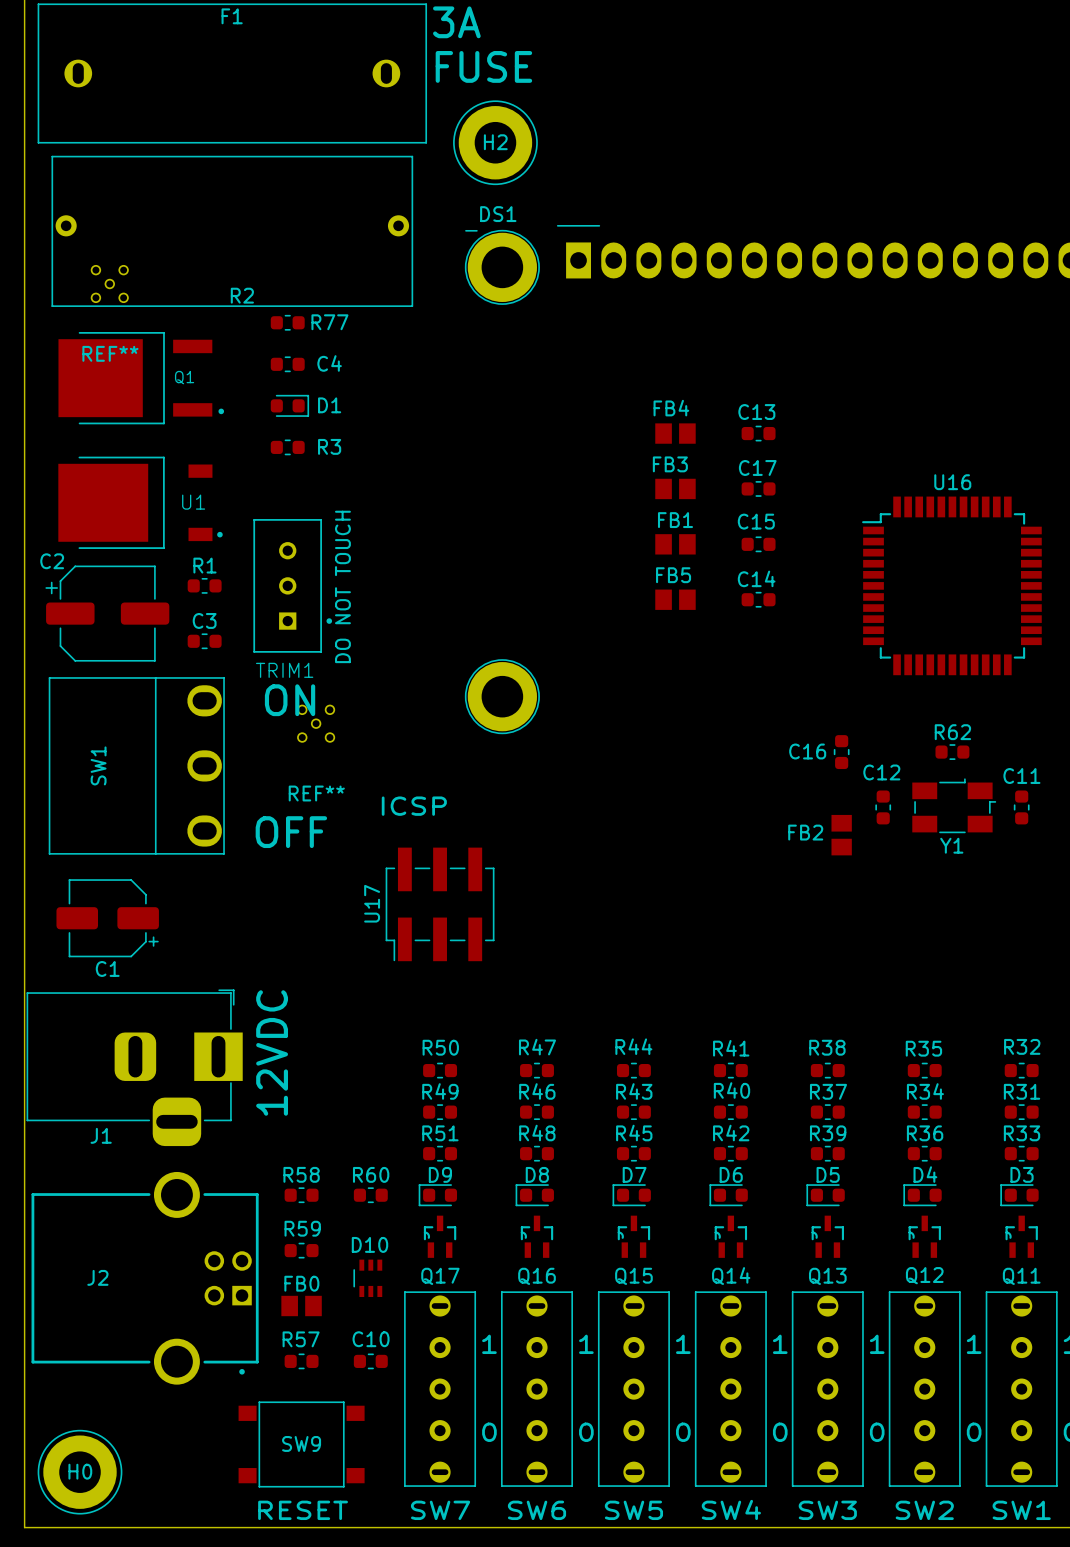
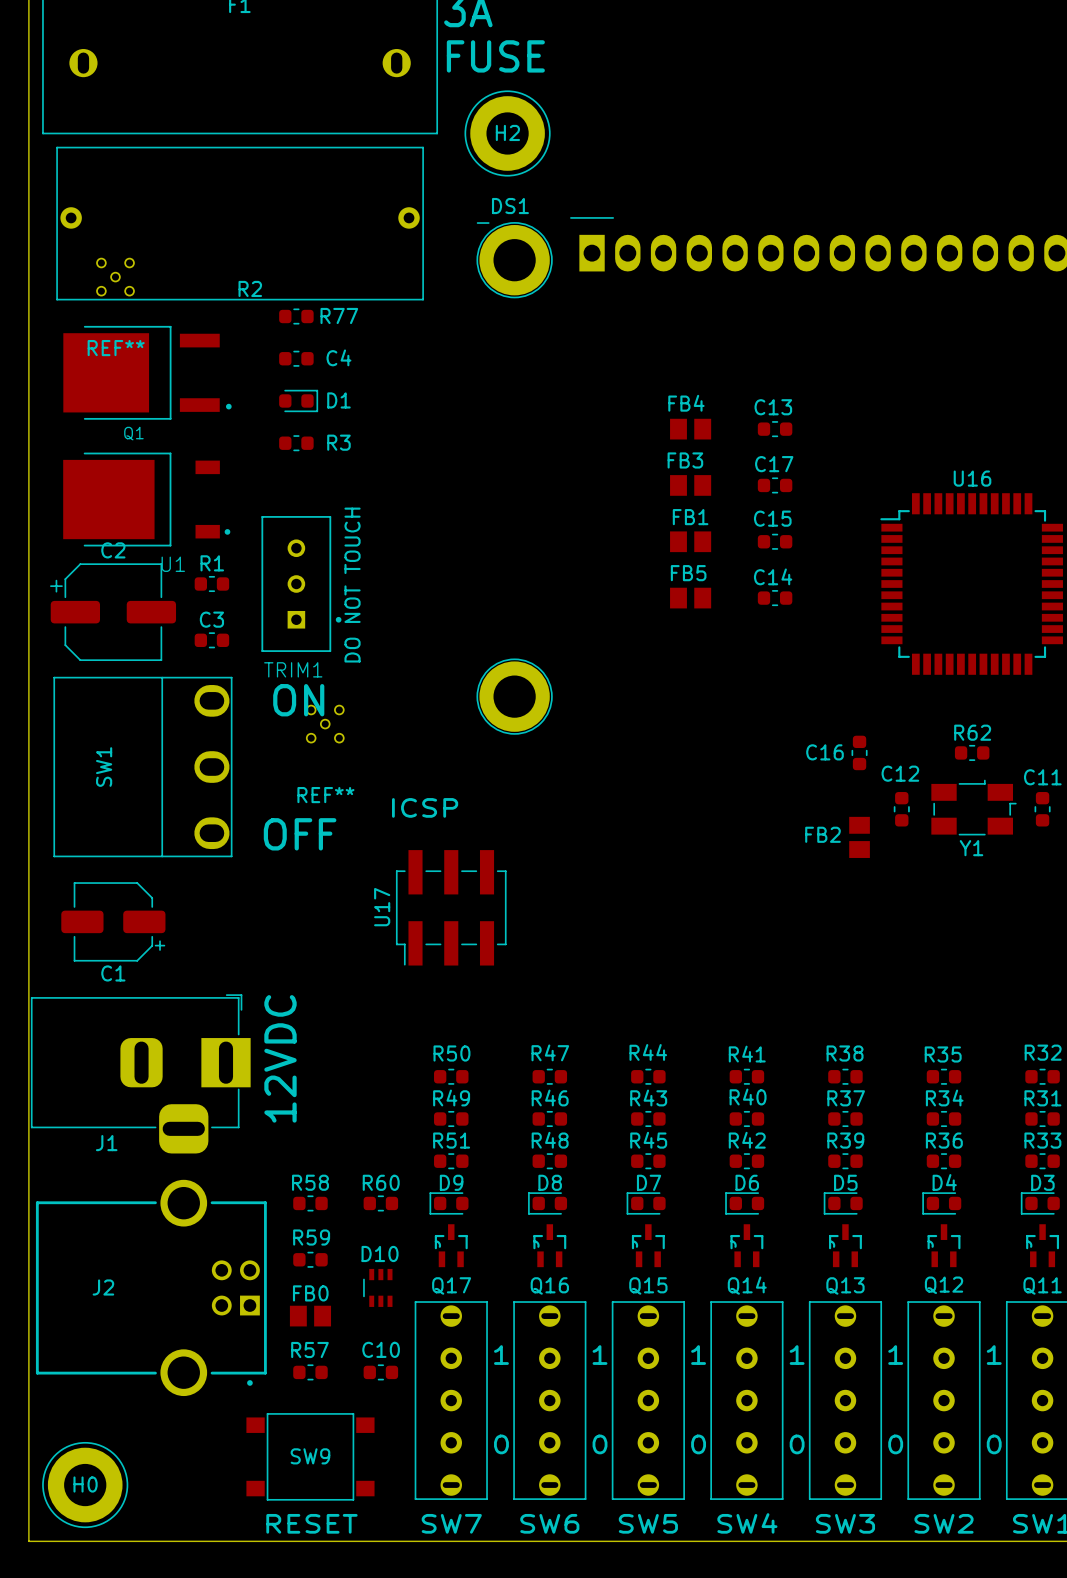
Q1 name position: Q1 (184, 377) -> Q1 (133, 433)
U1 name position: U1 (193, 502) -> U1 (173, 564)
C2 name position: C2 (52, 561) -> C2 (113, 550)

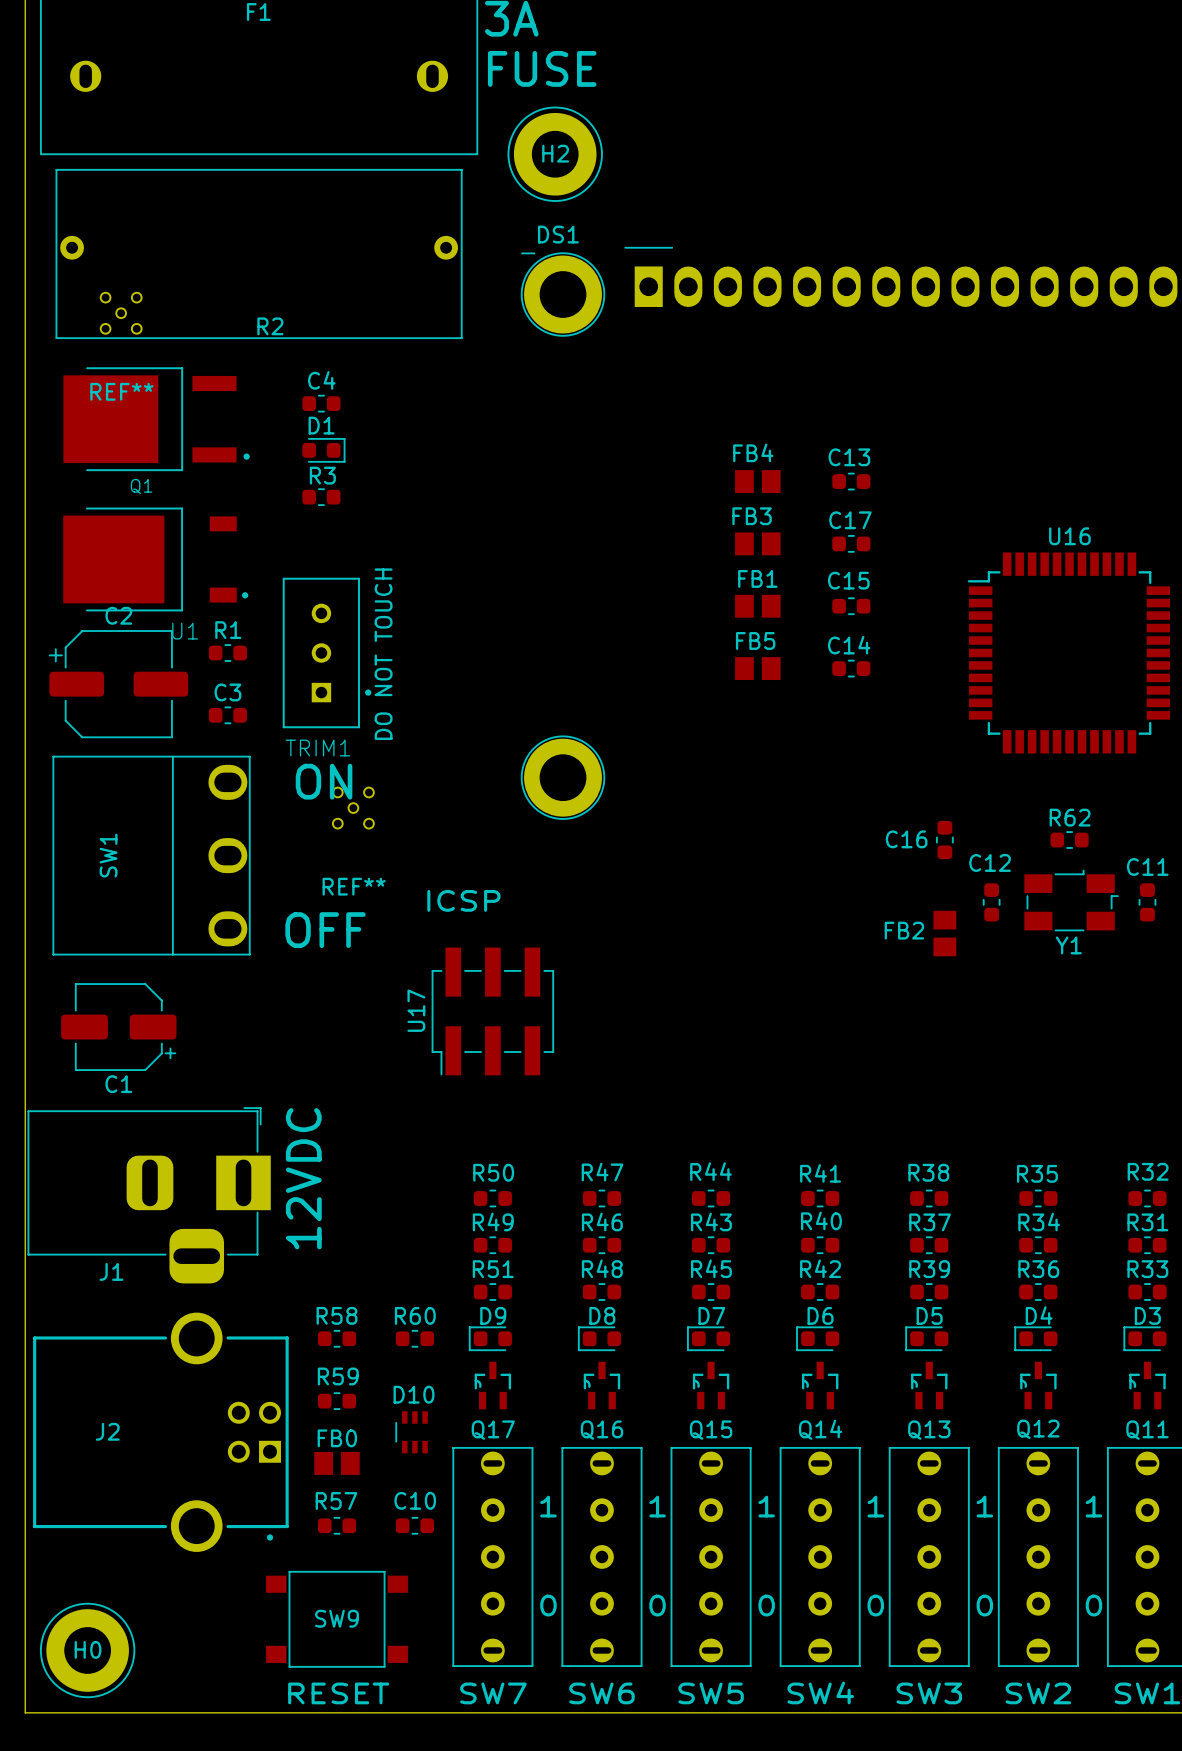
R77: (296, 316) -> none
C4 name position: C4 (338, 357) -> C4 (321, 380)
D1 name position: D1 (338, 400) -> D1 (321, 425)
R3 name position: R3 (338, 442) -> R3 (322, 475)

